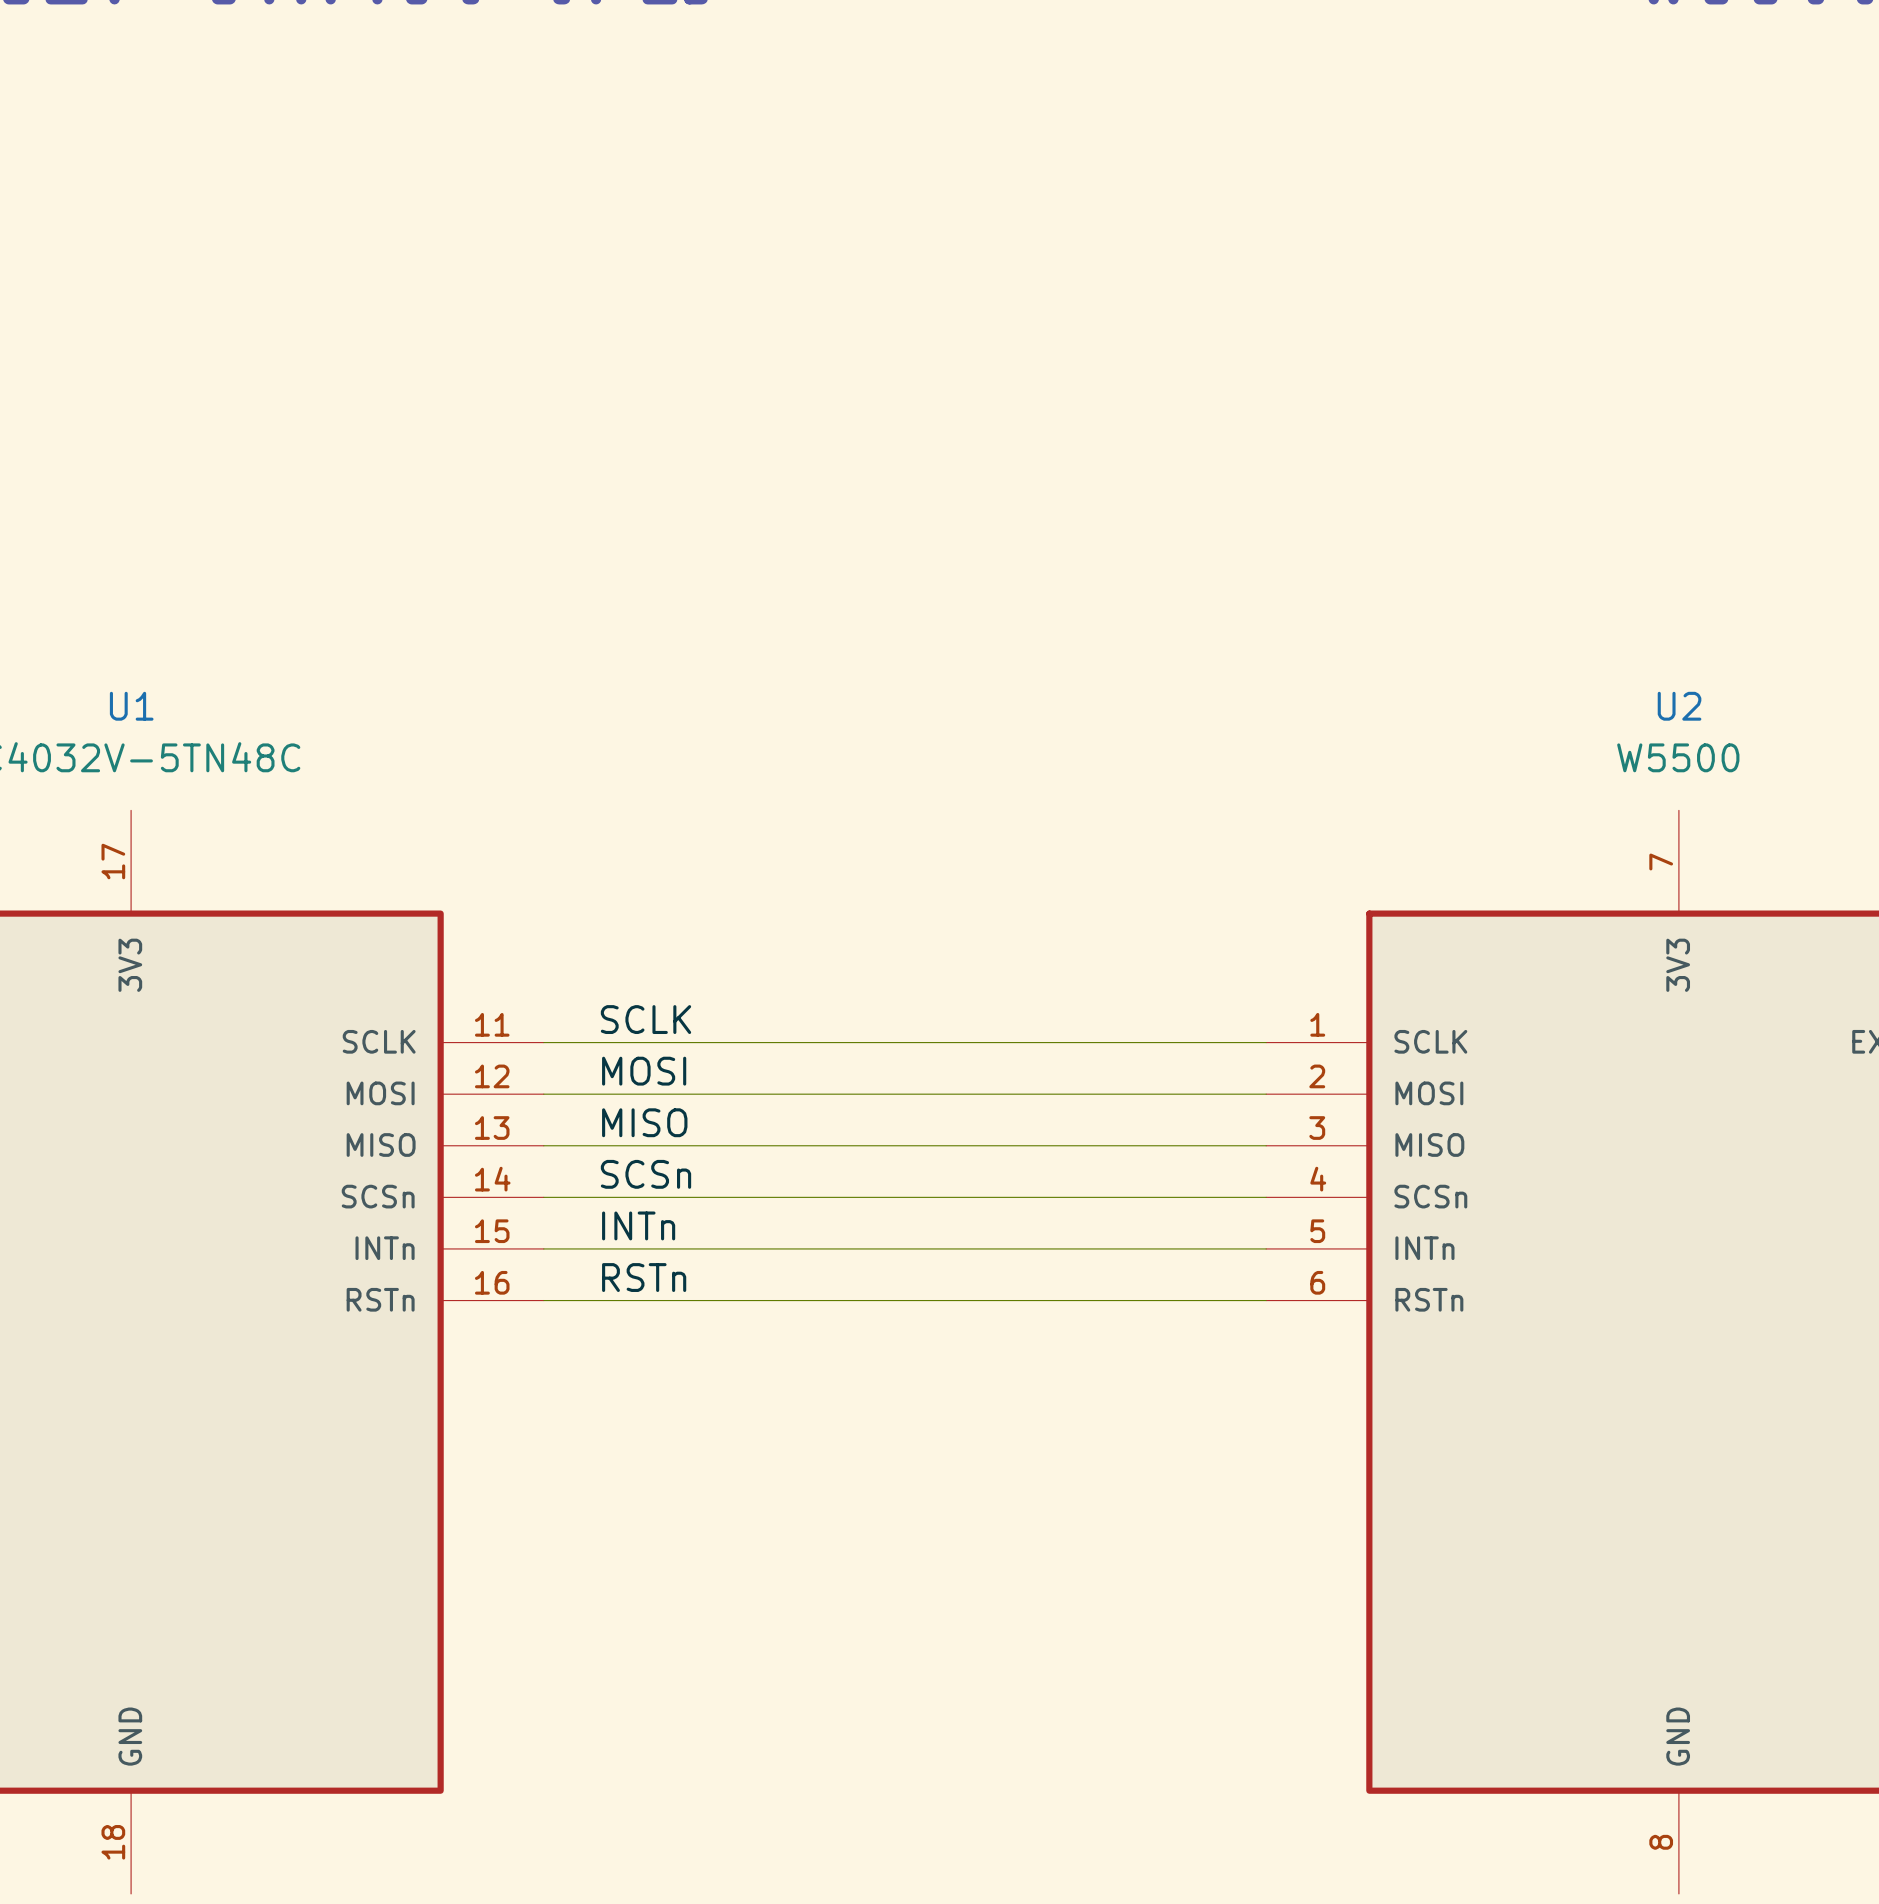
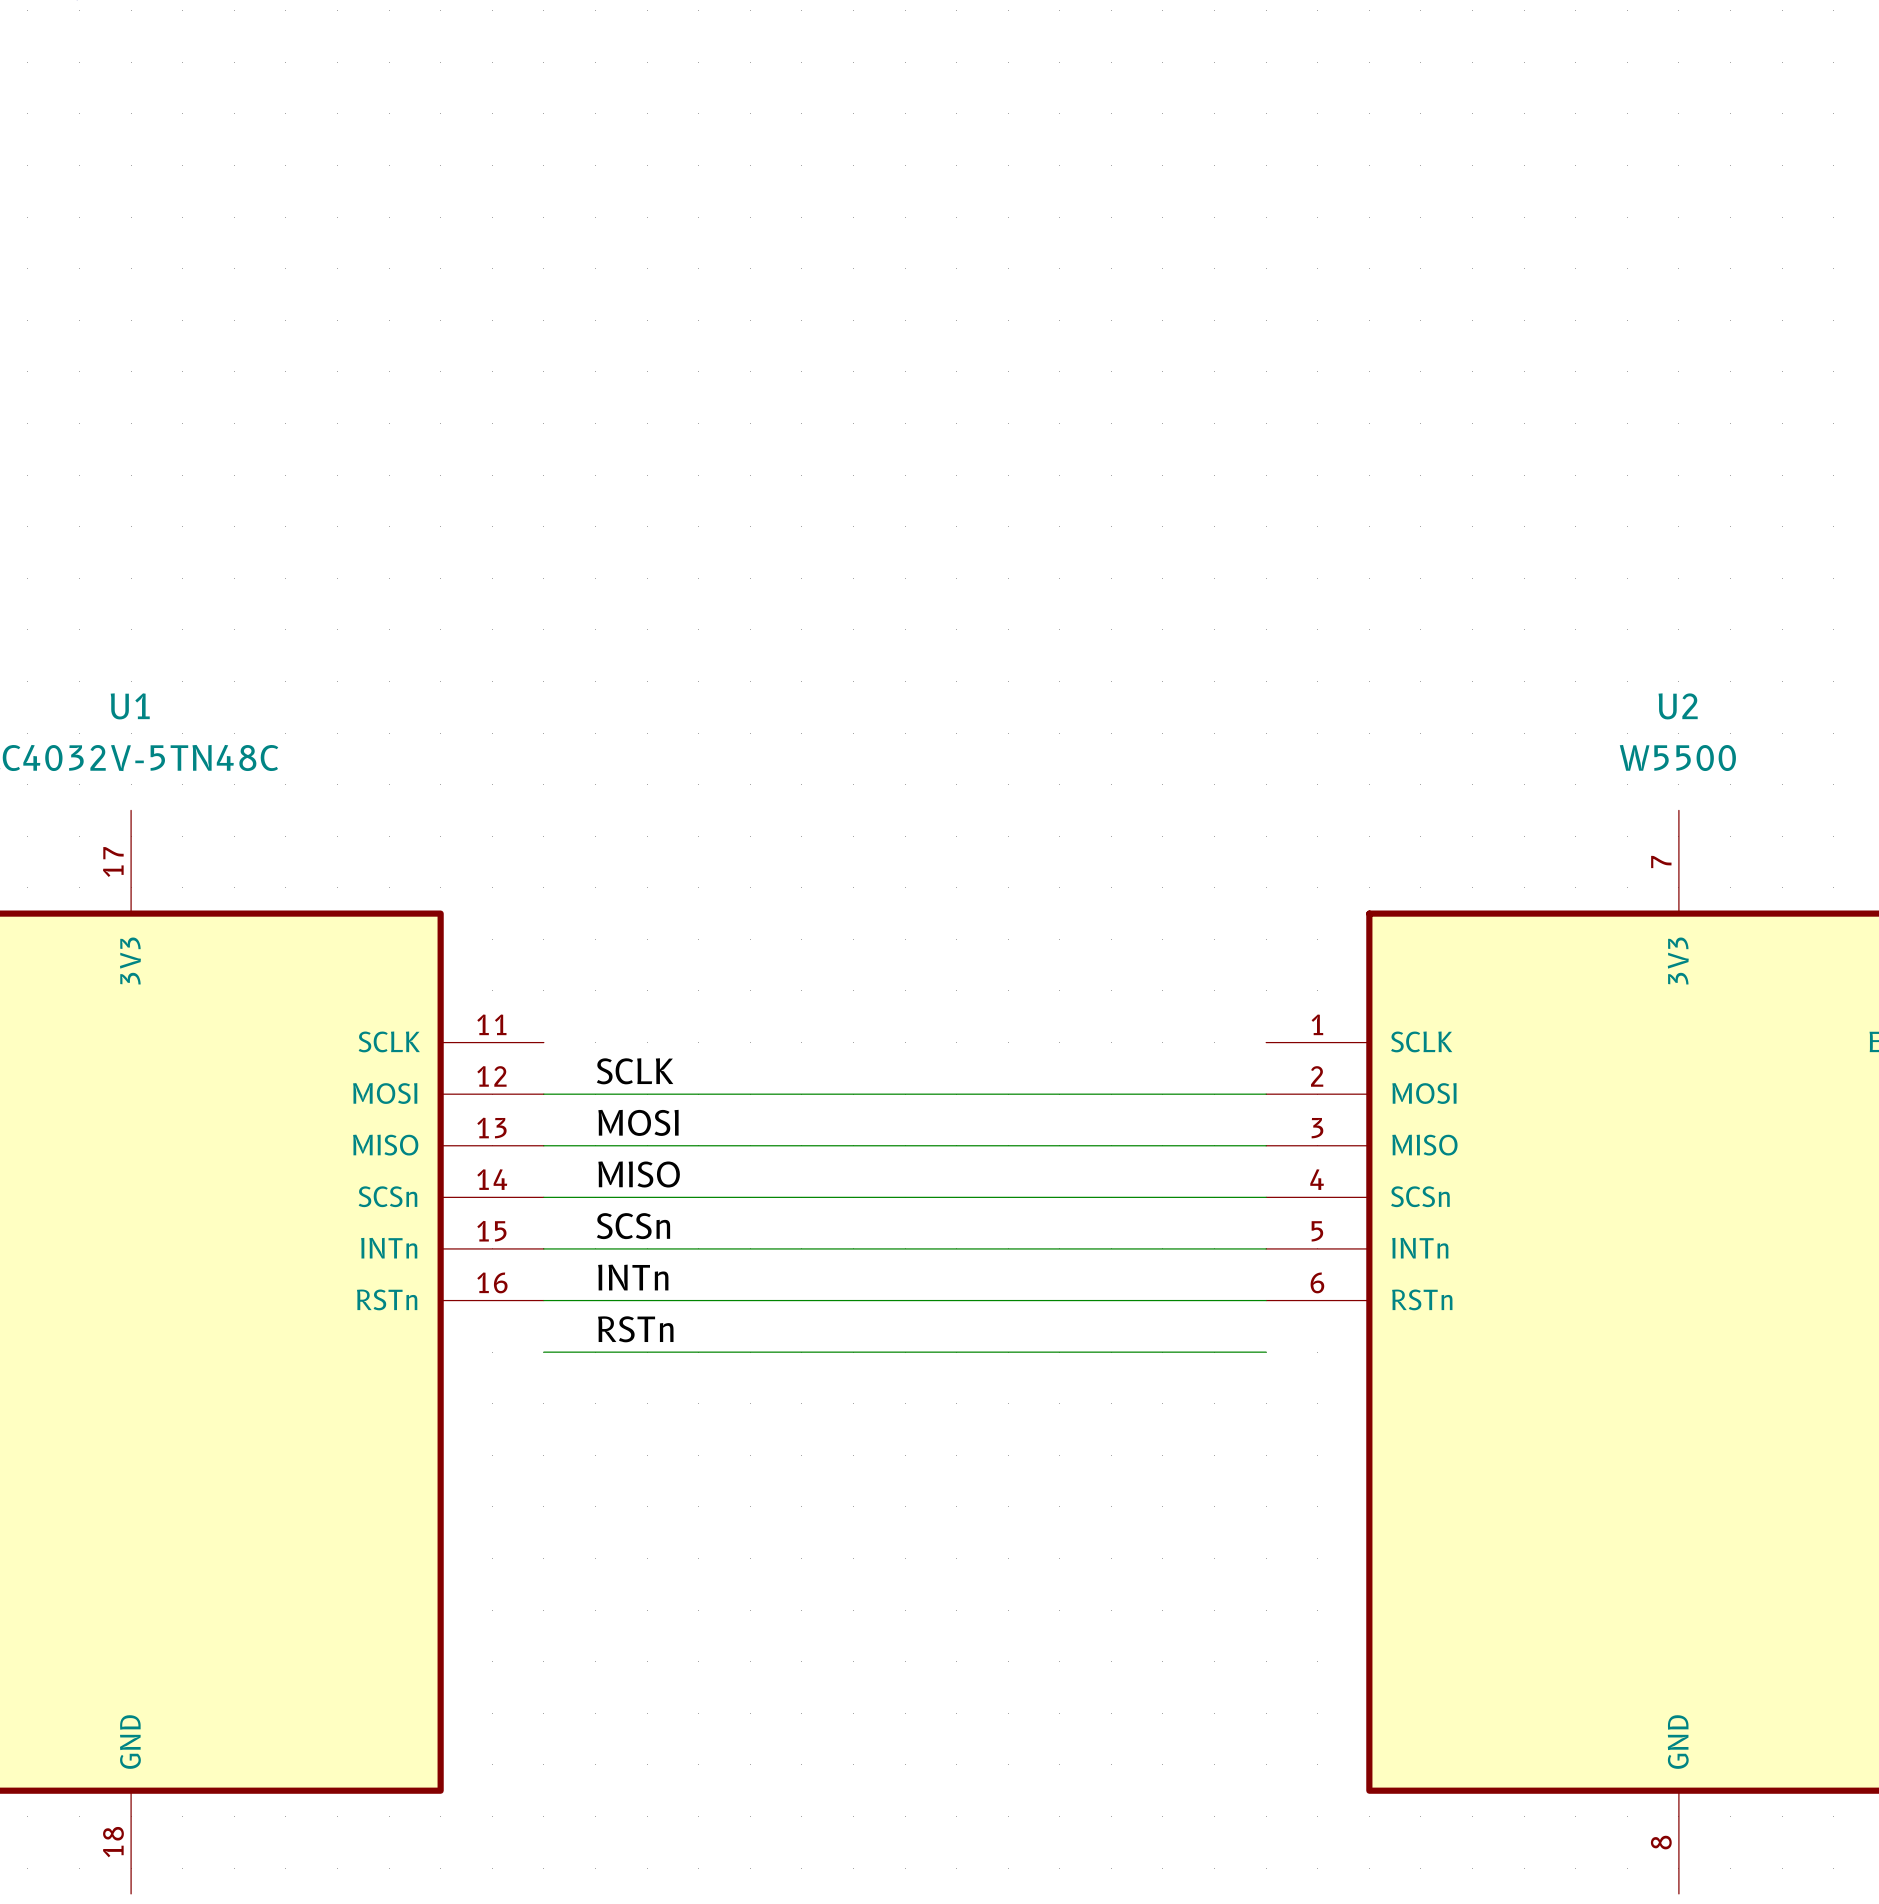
label: SCLK (645, 1019) -> none
wire: (543, 1042) (1266, 1042) -> (543, 1352) (1266, 1352)
label: MOSI (644, 1071) -> SCLK (635, 1071)
label: MISO (644, 1122) -> MOSI (638, 1122)
label: SCSn (645, 1174) -> MISO (639, 1174)
label: INTn (638, 1225) -> SCSn (633, 1226)
label: RSTn (644, 1277) -> INTn (633, 1277)
label: none -> RSTn (635, 1329)

